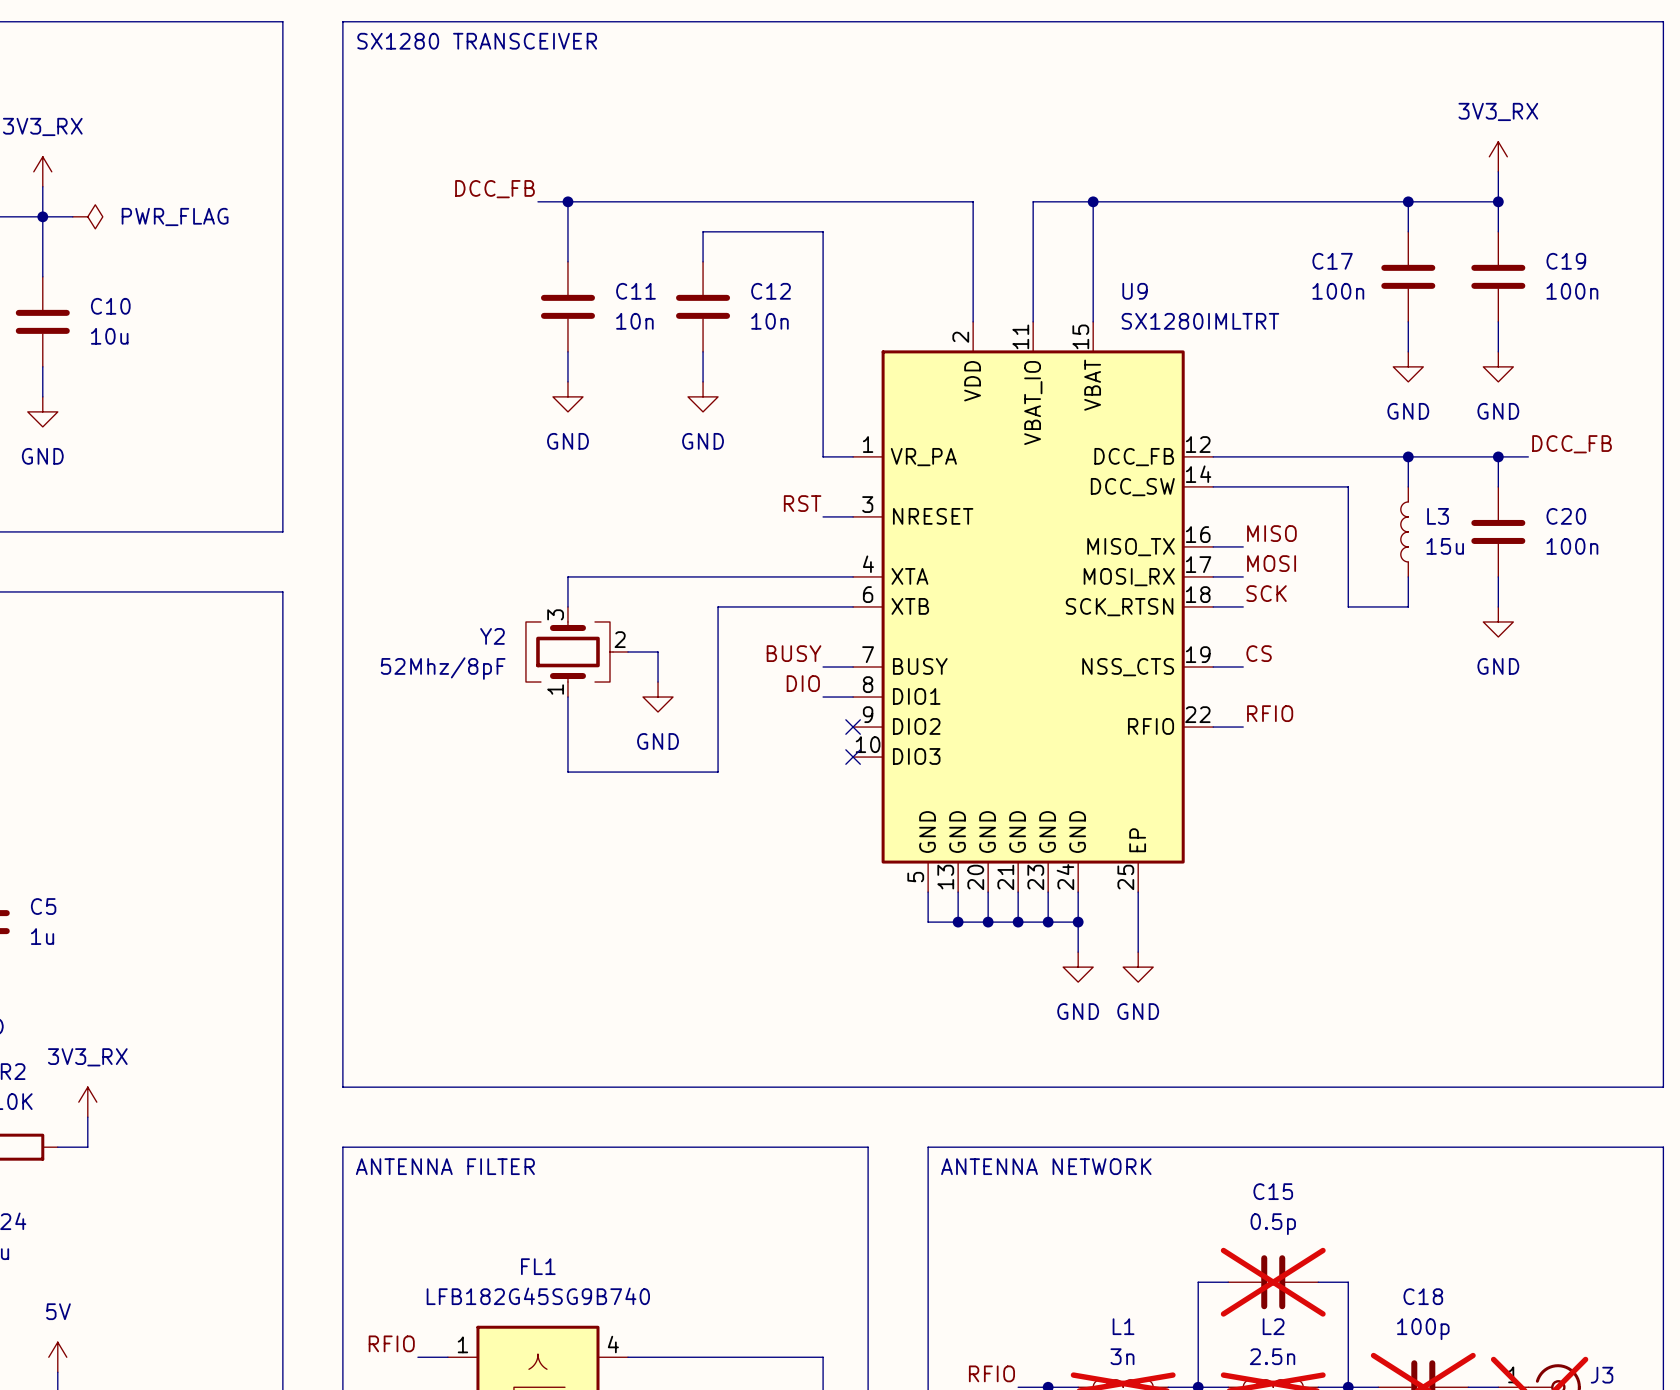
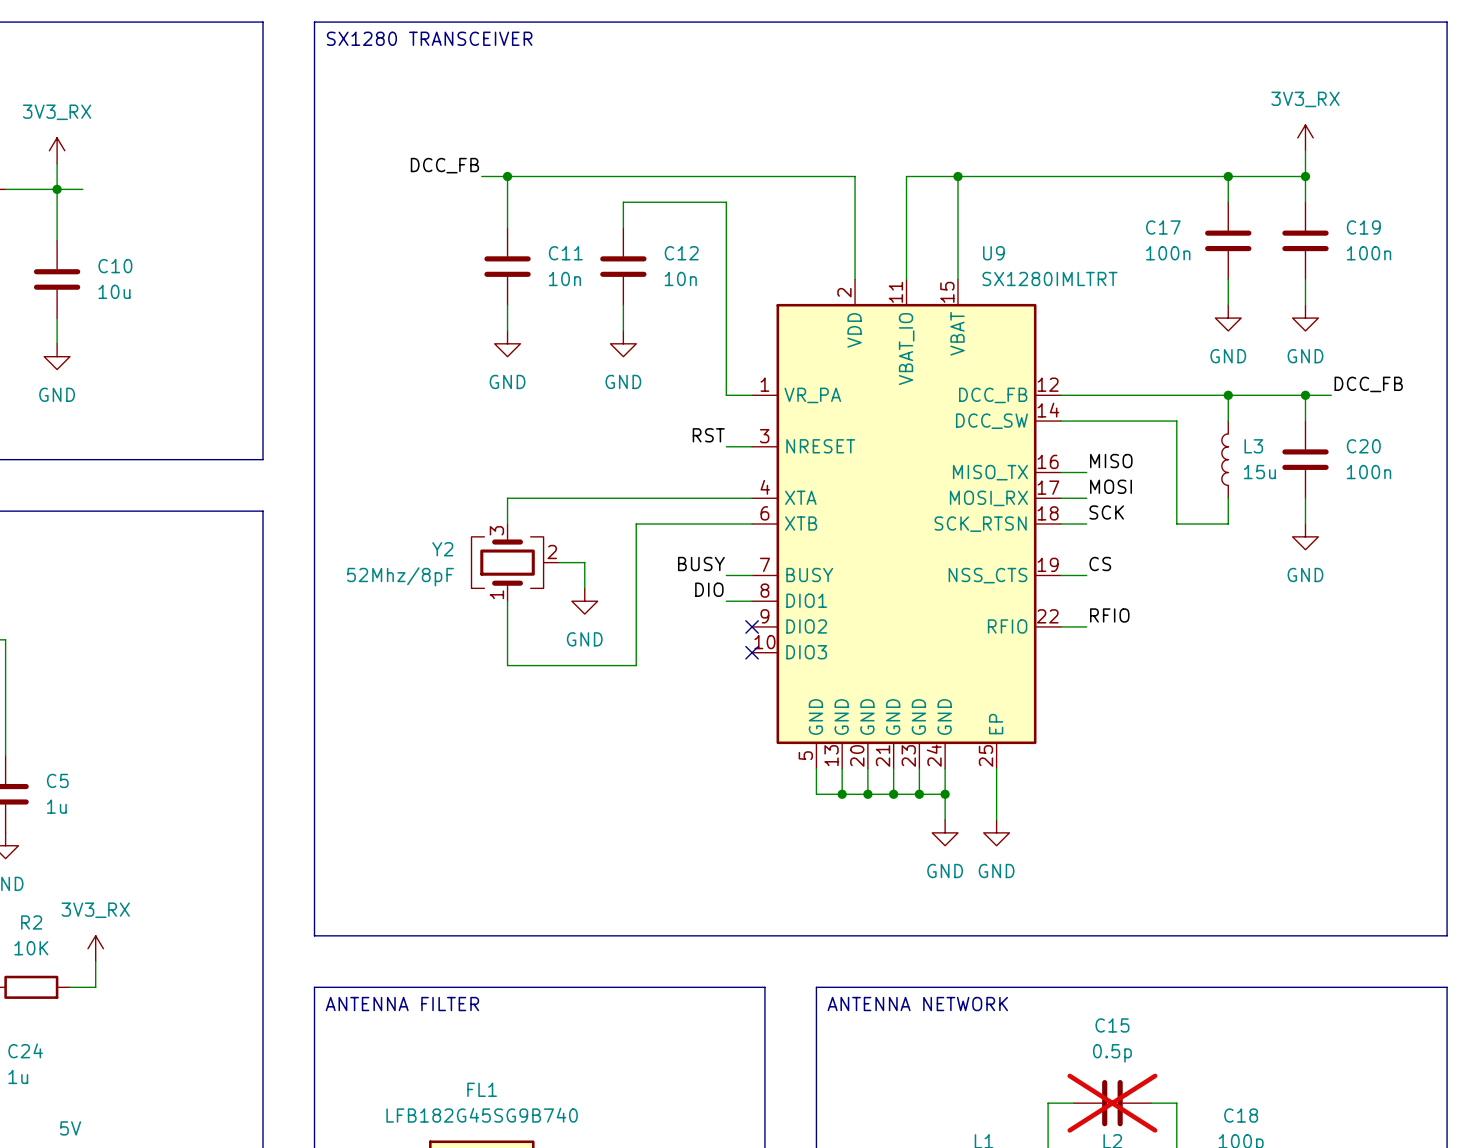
power symbol: PWR_FLAG (87, 216) -> none

